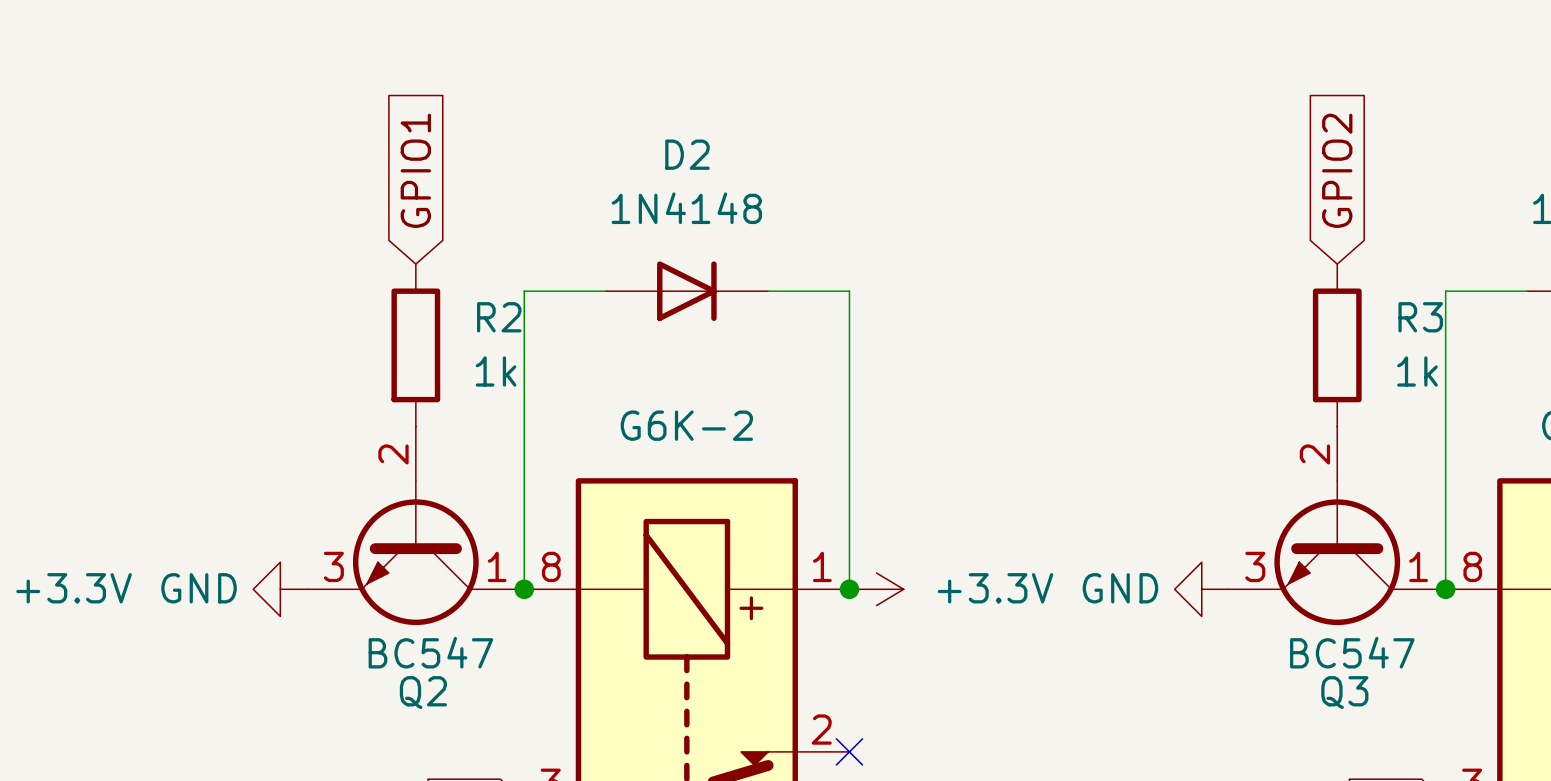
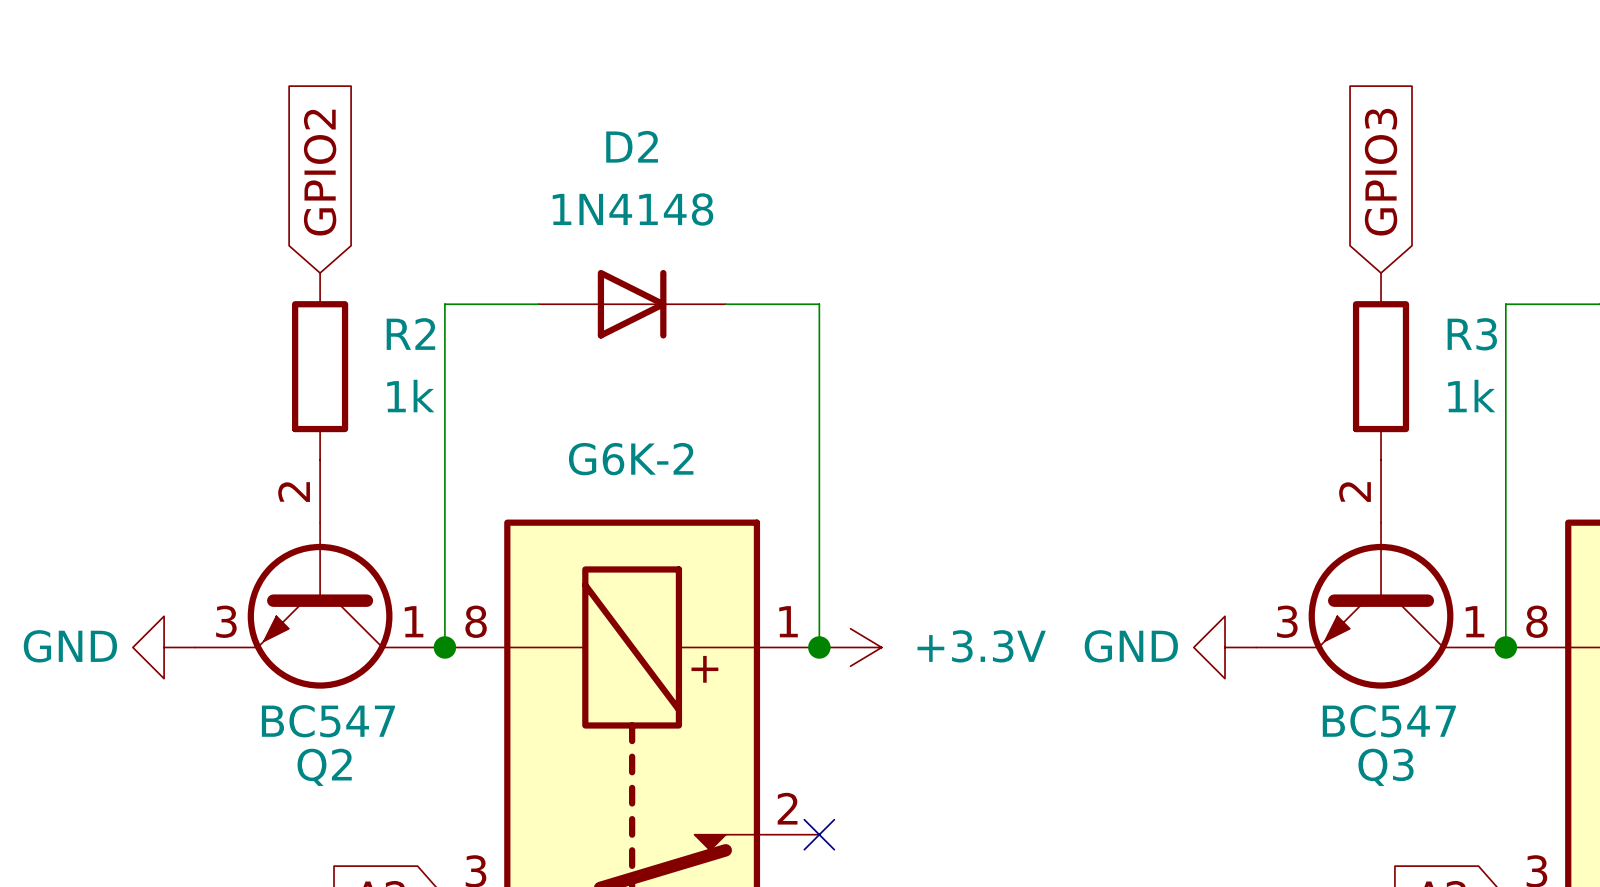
global label: GPIO1 (415, 170) -> GPIO2 (320, 172)
global label: GPIO2 (1337, 170) -> GPIO3 (1381, 172)

